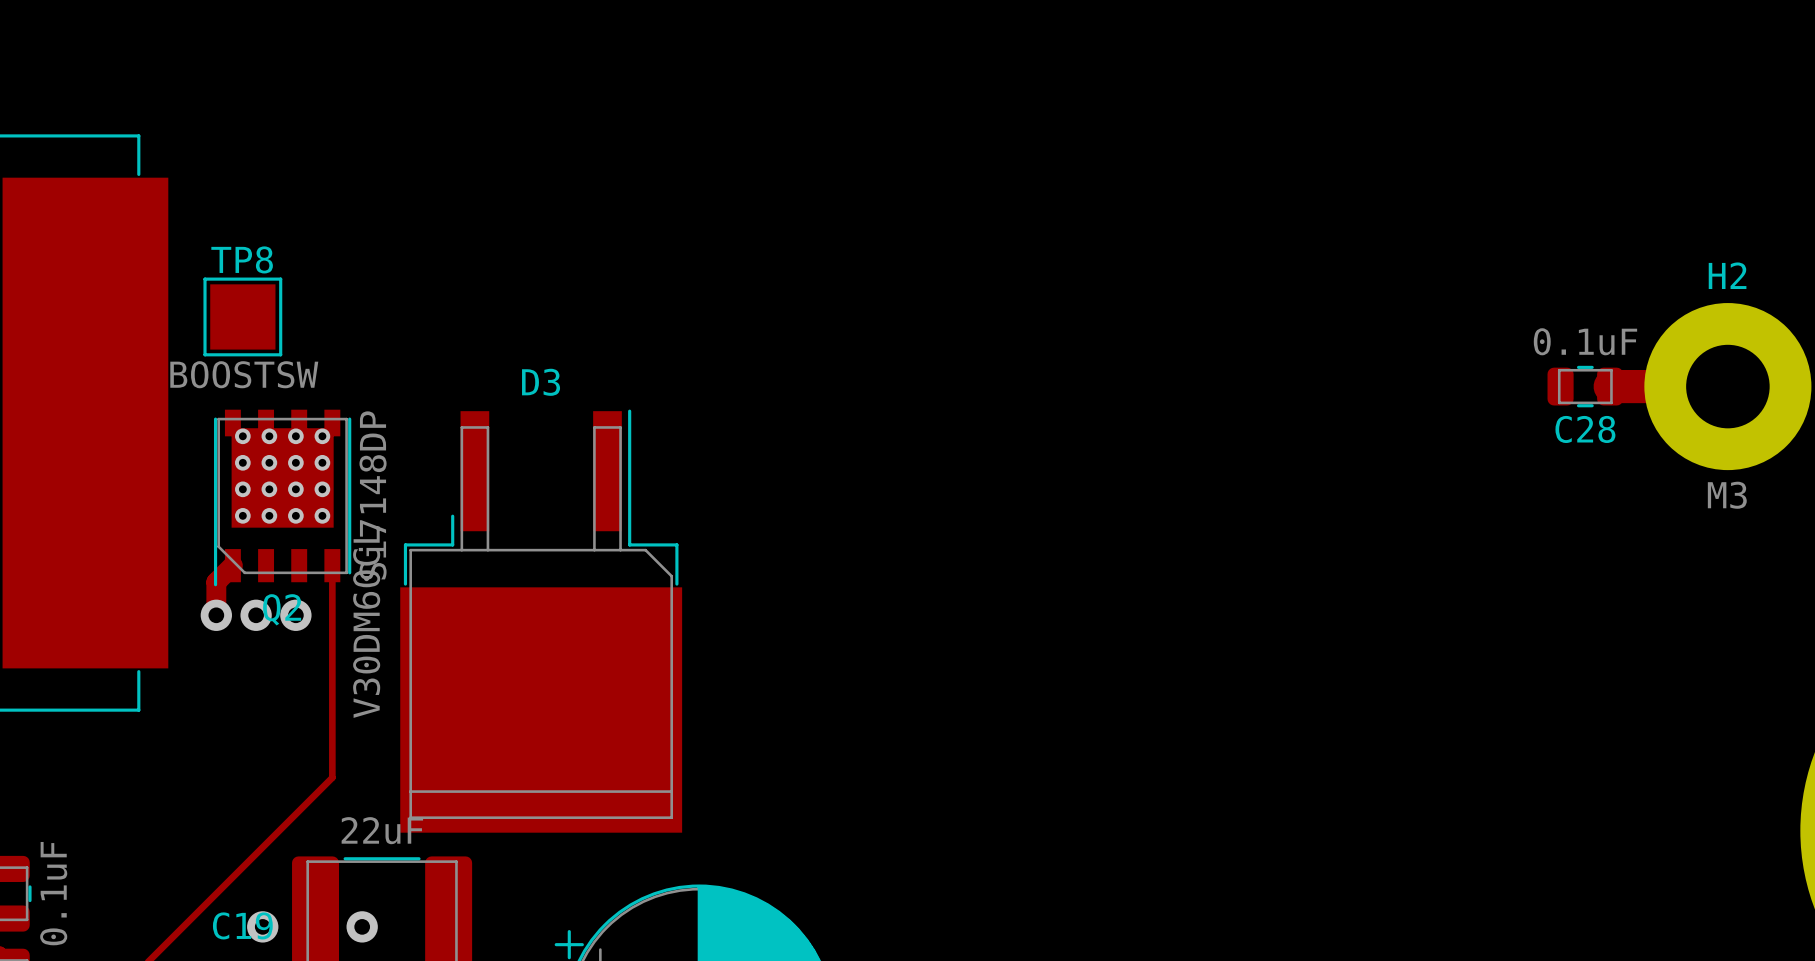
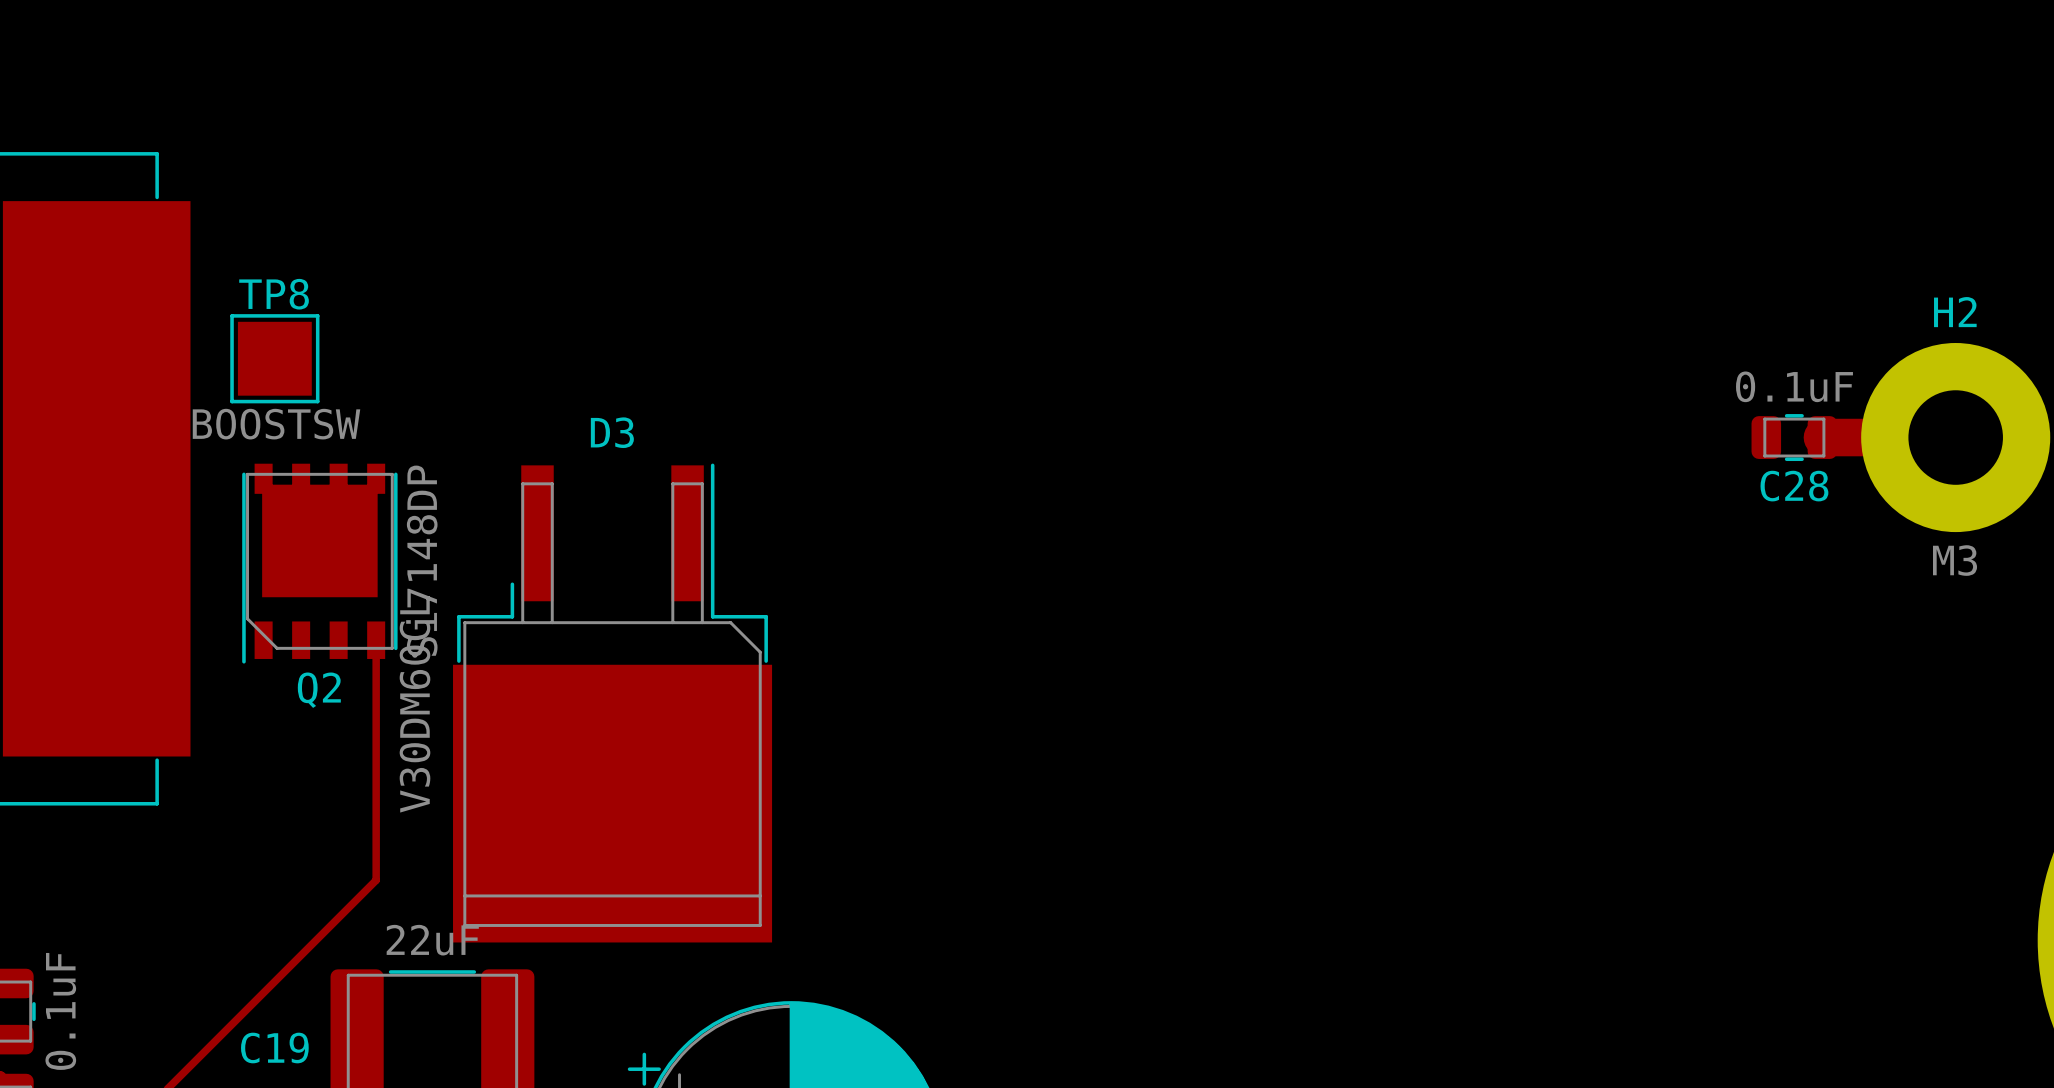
via: (242, 436) -> none
via: (269, 436) -> none
via: (295, 436) -> none
via: (322, 436) -> none
via: (242, 462) -> none
via: (269, 462) -> none
via: (295, 462) -> none
via: (322, 462) -> none
via: (242, 489) -> none
via: (269, 489) -> none
via: (295, 489) -> none
via: (322, 489) -> none
via: (242, 515) -> none
via: (269, 515) -> none
via: (295, 515) -> none
via: (322, 515) -> none
top track: (232, 565) (216, 582) (216, 615) -> none
via: (216, 615) -> none
via: (256, 615) -> none
via: (295, 615) -> none
via: (262, 926) -> none
via: (362, 926) -> none

